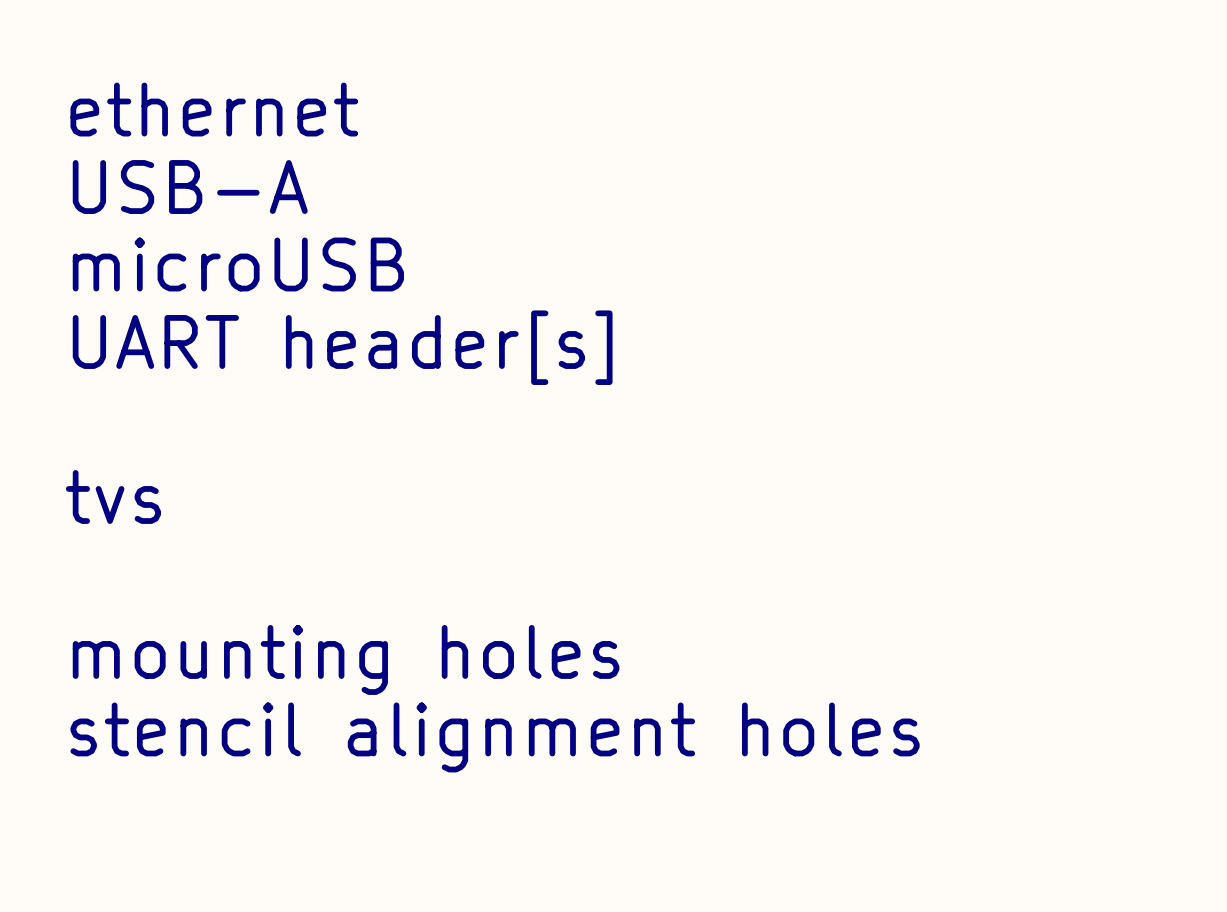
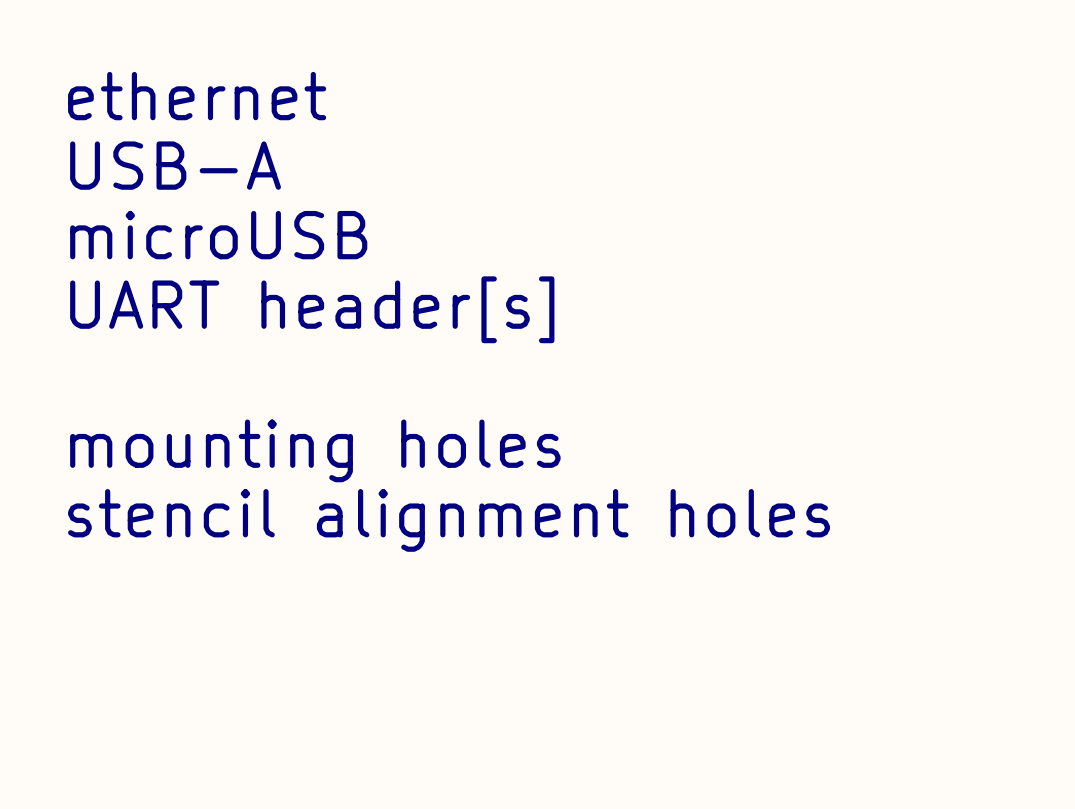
text: tvs (113, 496) -> mounting holes (315, 450)
text: mounting holes (346, 659) -> none
text position: stencil alignment holes (495, 737) -> stencil alignment holes (449, 520)

